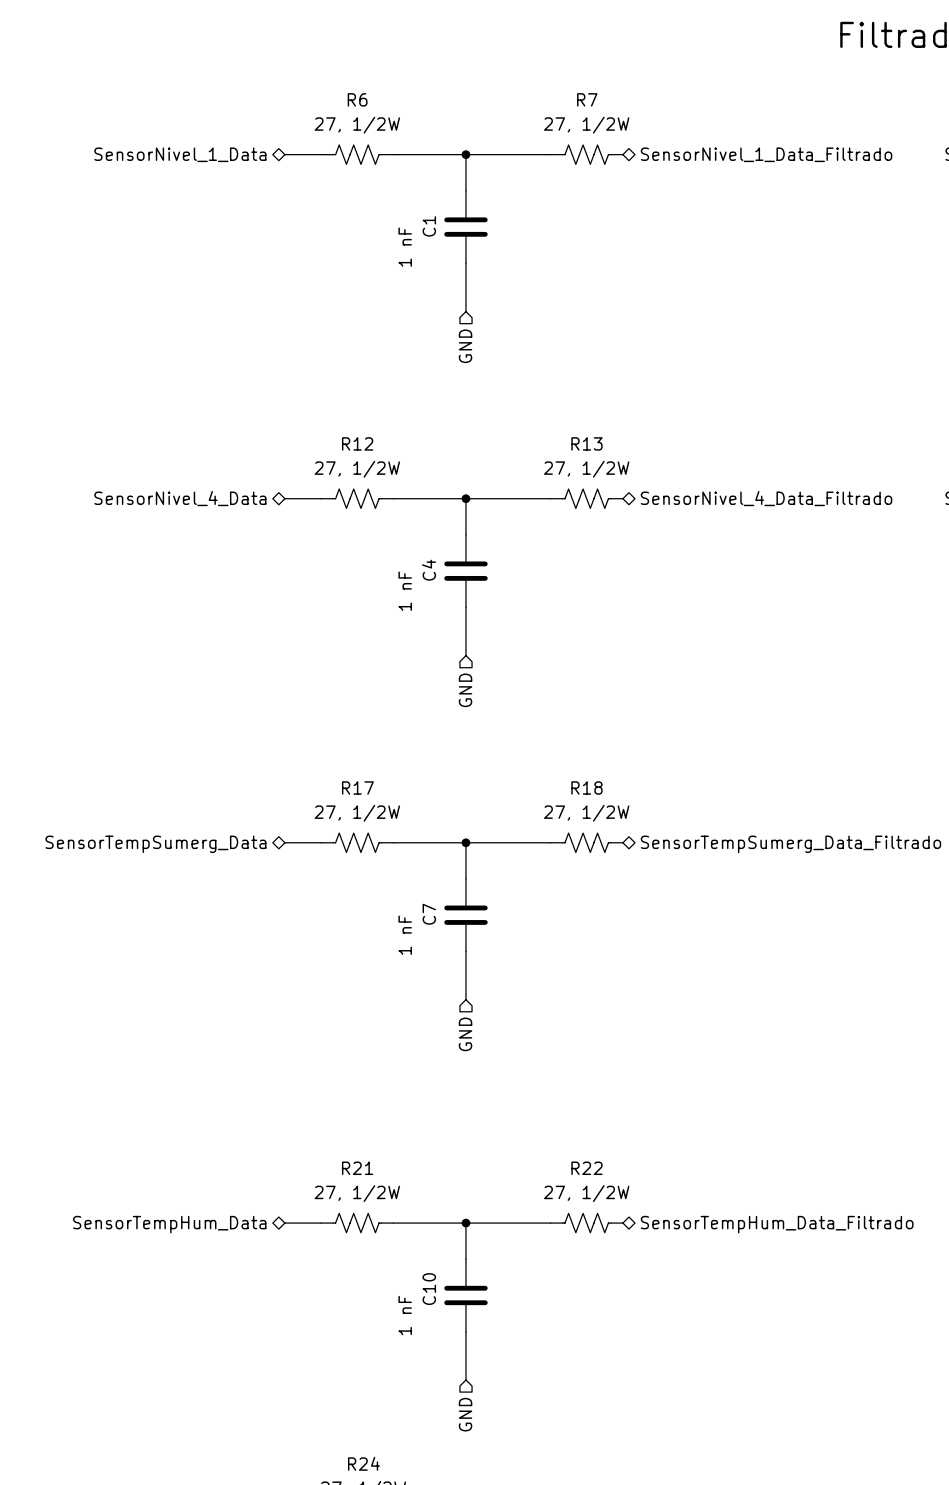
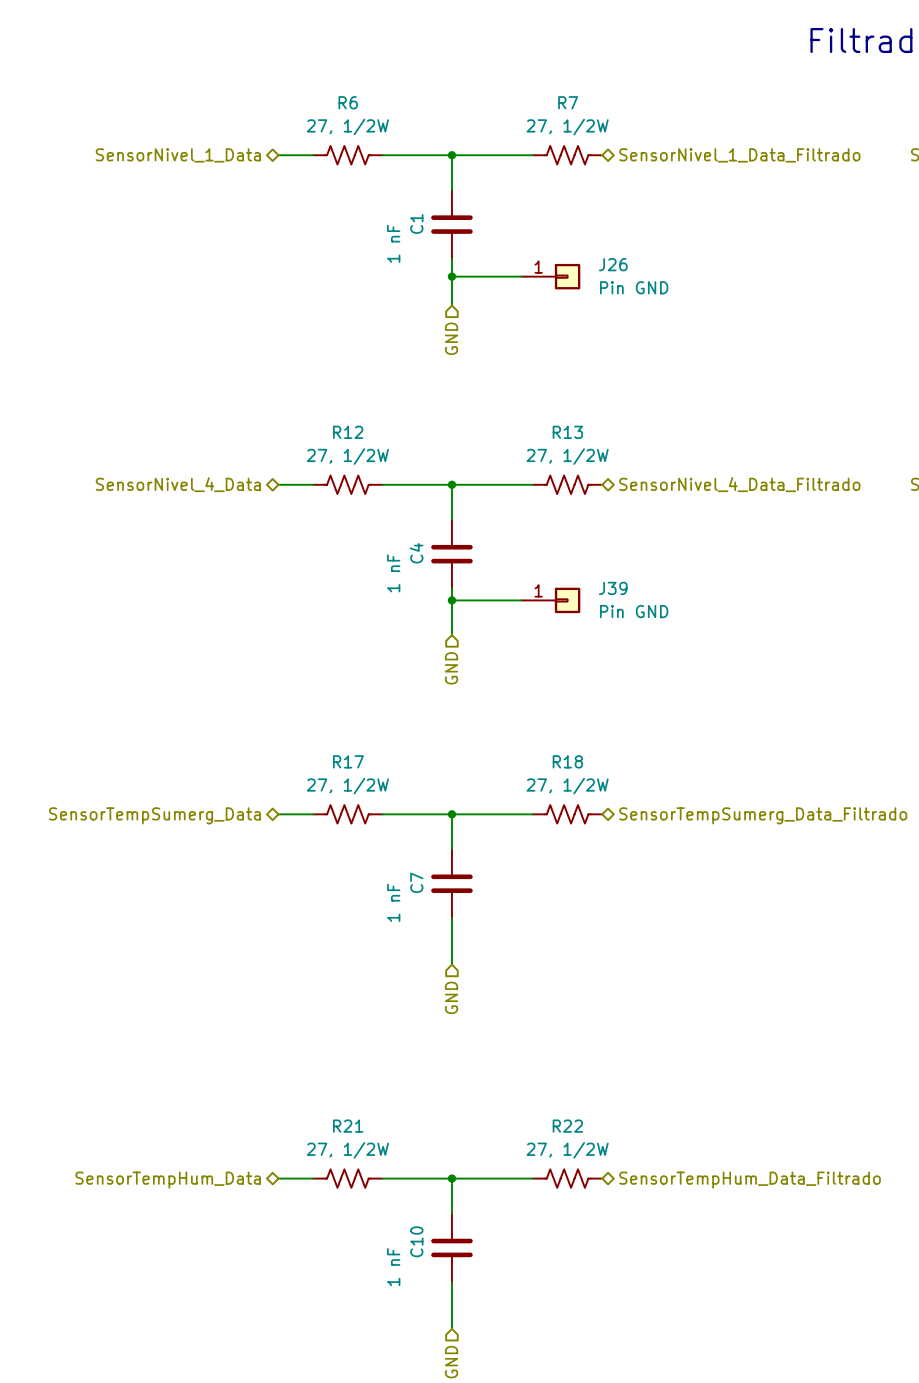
wire: none -> (451, 276) (521, 276)
junction: none -> (451, 276)
J26: none -> Pin GND (550, 276)
wire: none -> (451, 600) (521, 600)
junction: none -> (451, 600)
J39: none -> Pin GND (550, 600)

